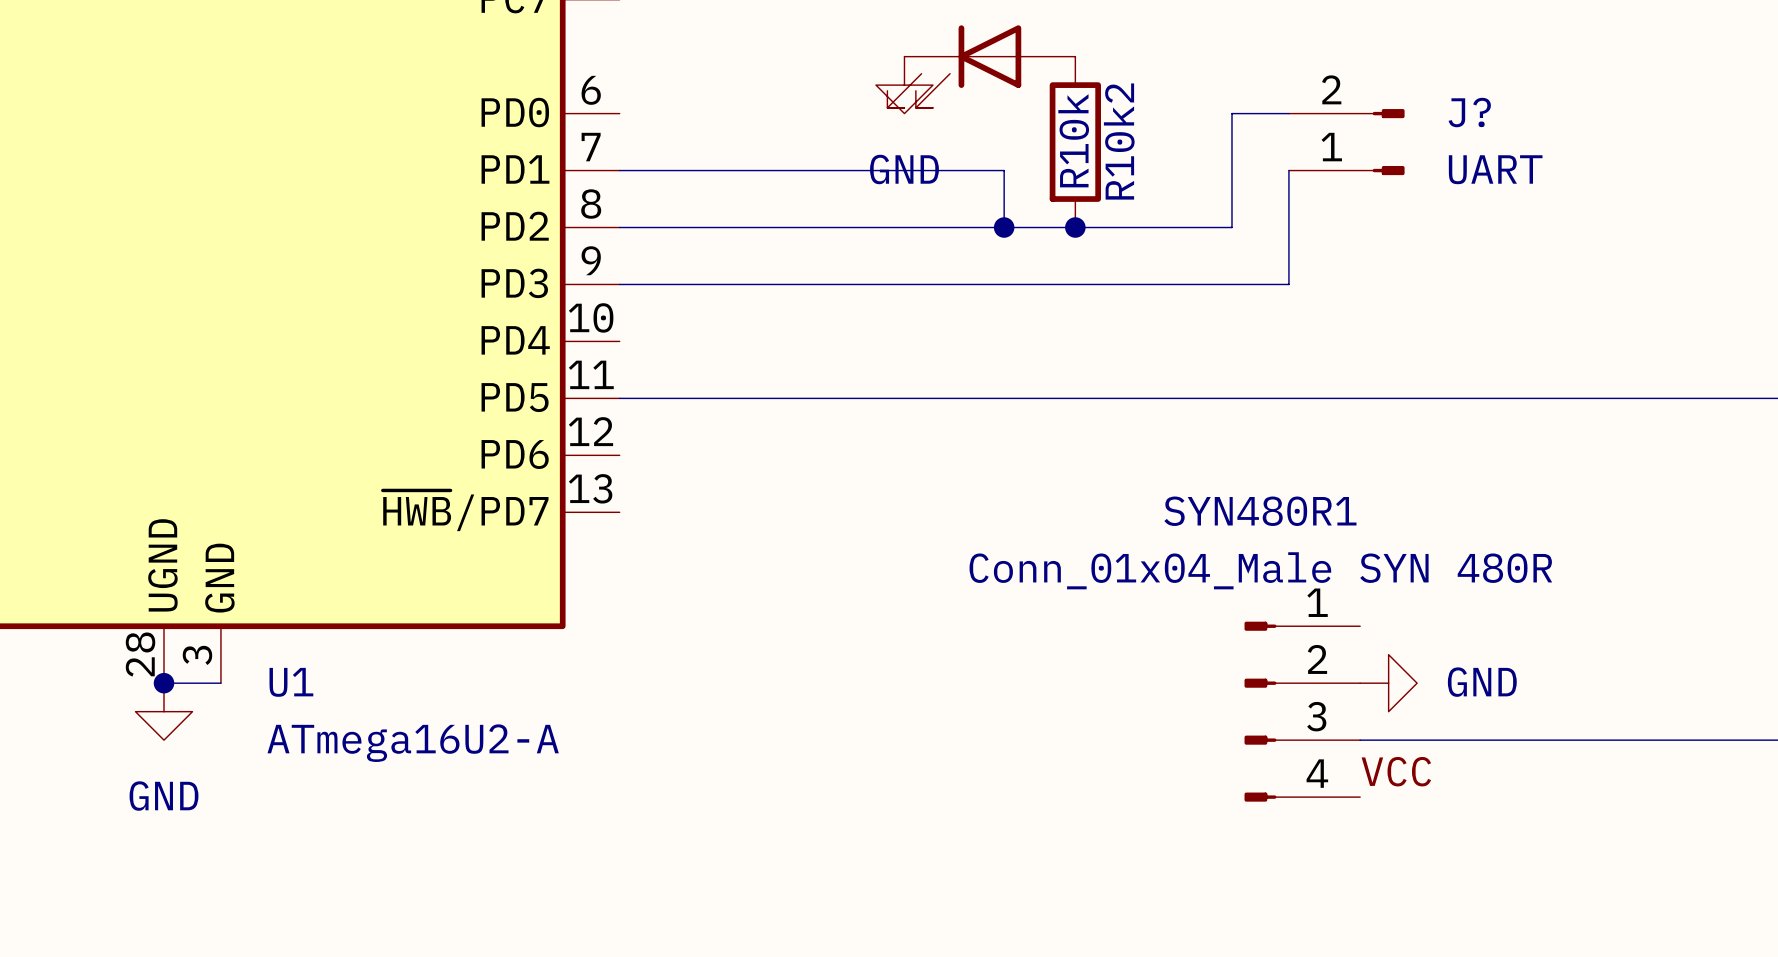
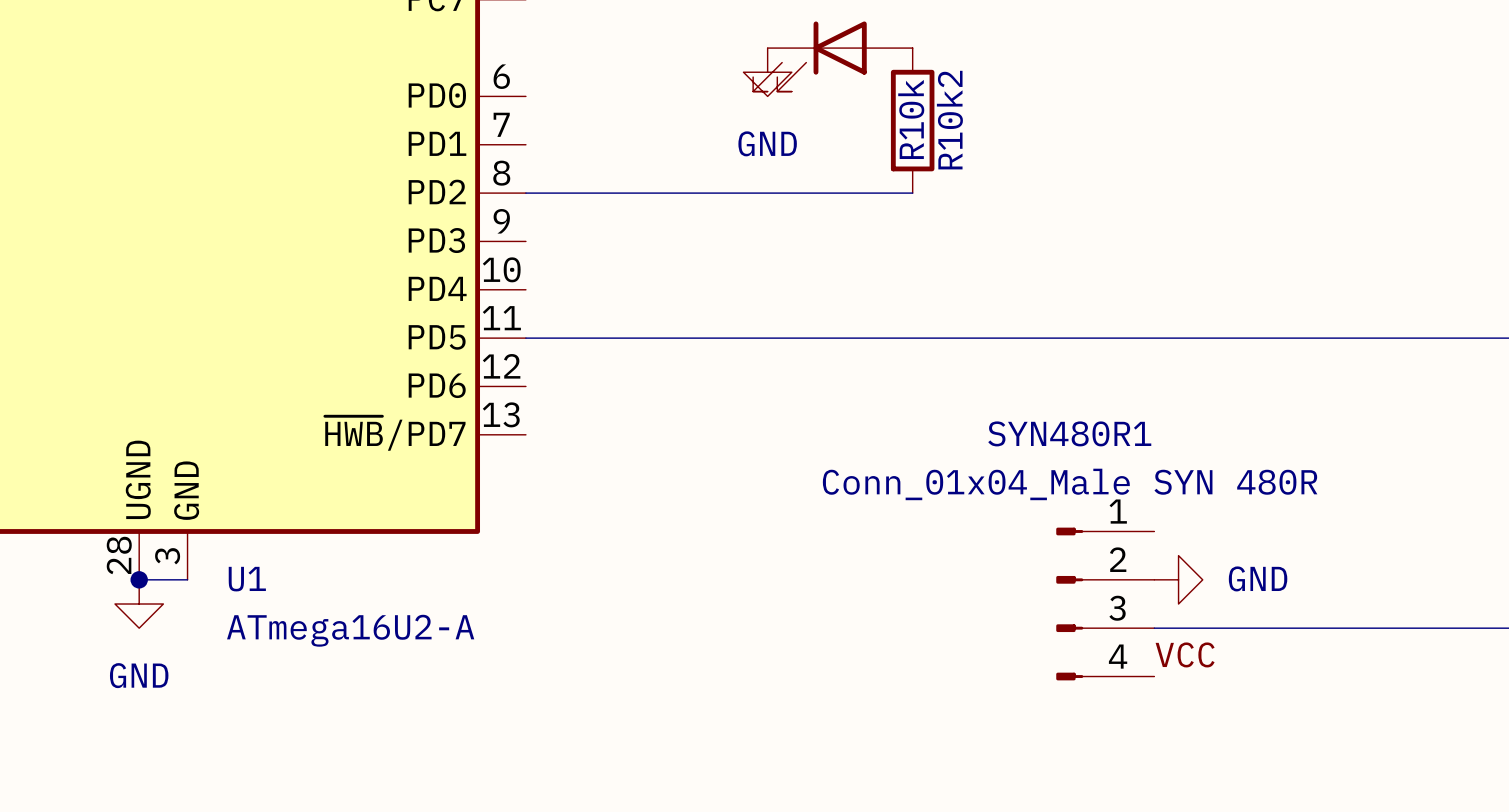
wire: (1288, 113) (1231, 113) (1231, 227) (1075, 227) -> none
J?: UART (1346, 142) -> none
wire: (619, 170) (1004, 170) (1004, 227) -> none
wire: (1288, 170) (1288, 284) (619, 284) -> none
junction: (1004, 227) -> none
junction: (1075, 227) -> none

